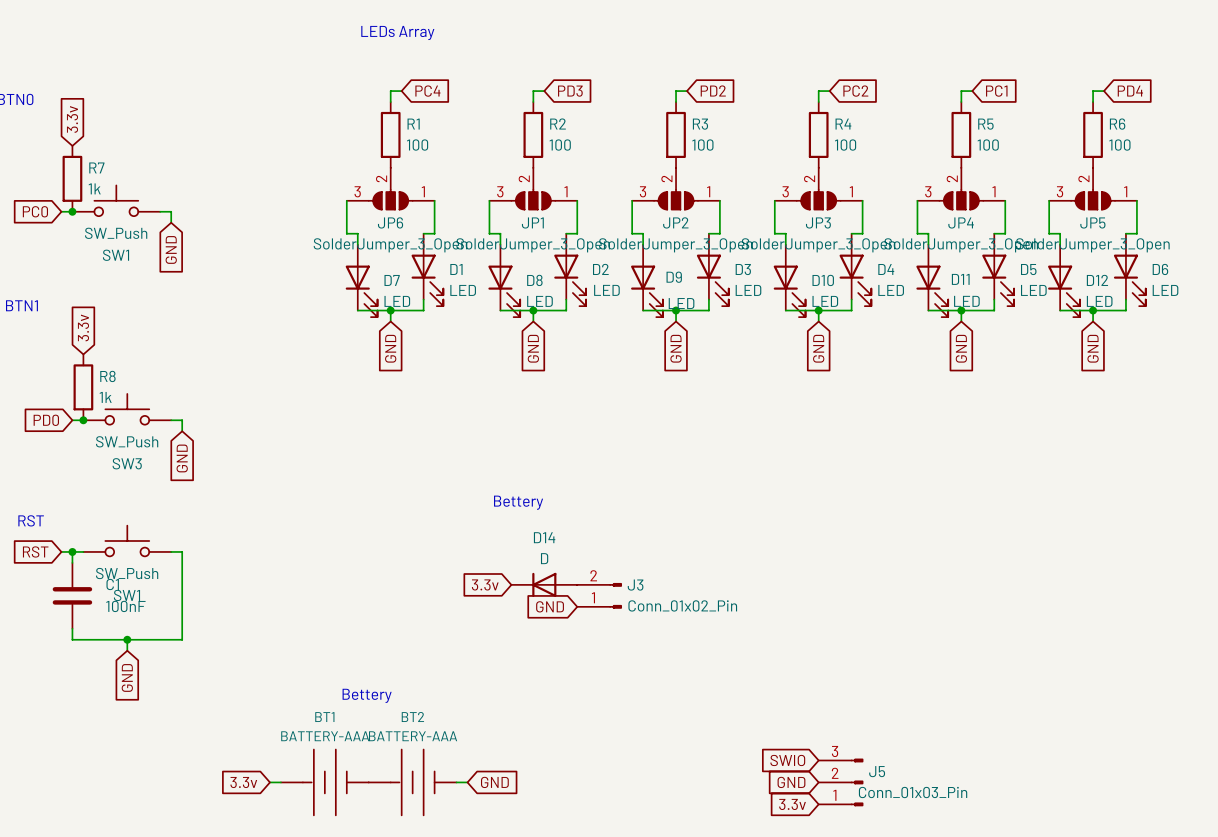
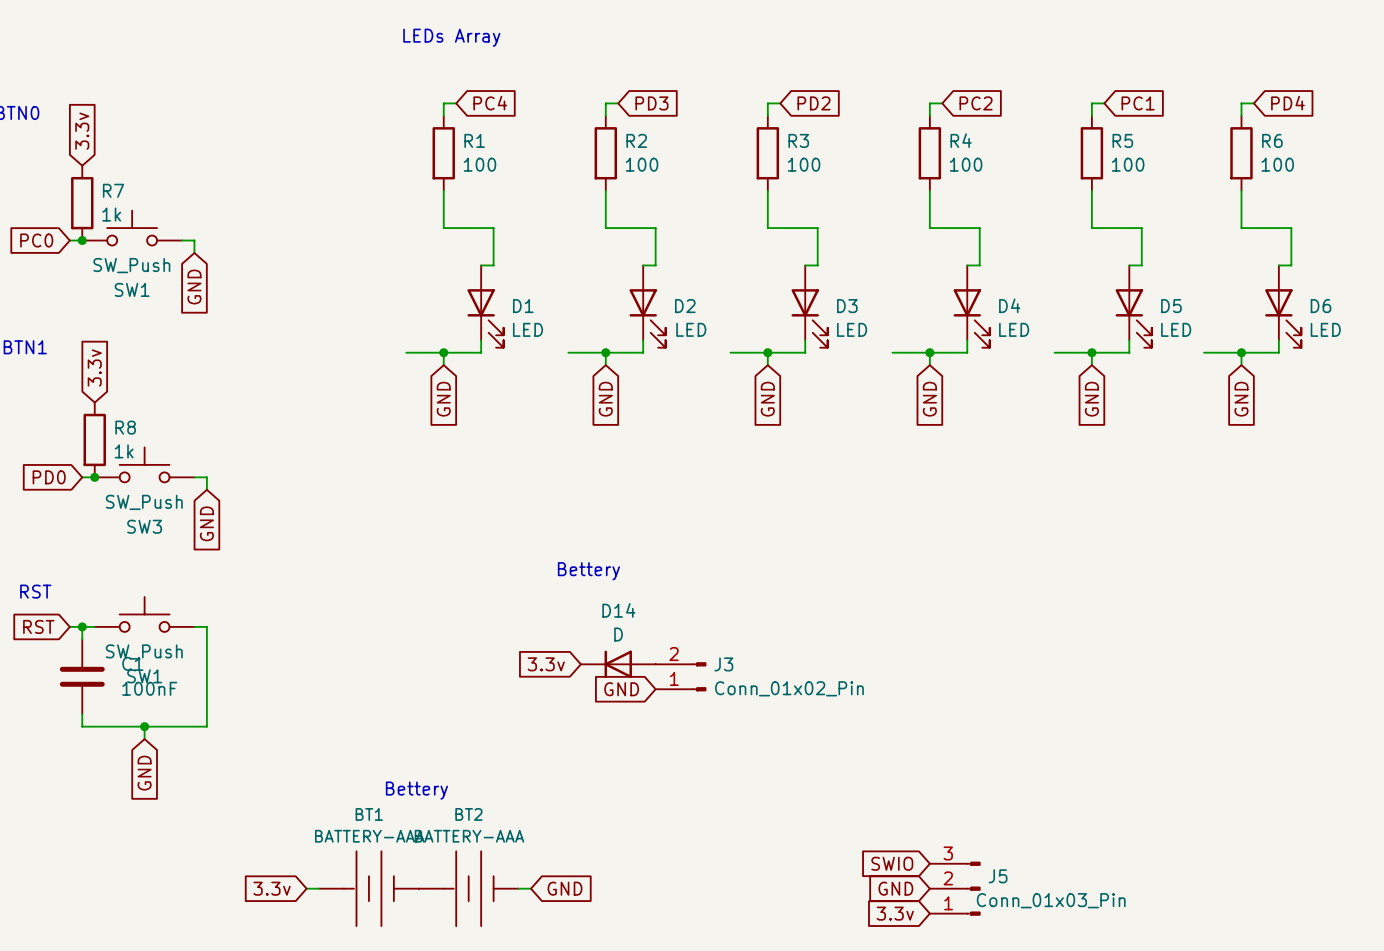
JP6: SolderJumper_3_Open (390, 188) -> none
JP1: SolderJumper_3_Open (533, 188) -> none
JP2: SolderJumper_3_Open (676, 188) -> none
JP3: SolderJumper_3_Open (818, 188) -> none
JP4: SolderJumper_3_Open (961, 188) -> none
JP5: SolderJumper_3_Open (1093, 188) -> none
wire: (346, 200) (346, 233) (357, 233) (357, 244) -> none
wire: (489, 200) (489, 233) (500, 233) (500, 244) -> none
wire: (632, 200) (632, 233) (643, 233) (643, 244) -> none
wire: (774, 200) (774, 233) (785, 233) (785, 244) -> none
wire: (917, 200) (917, 233) (928, 233) (928, 244) -> none
wire: (1049, 200) (1049, 233) (1060, 233) (1060, 244) -> none
D7: LED (361, 280) -> none
D8: LED (504, 280) -> none
D9: LED (646, 280) -> none
D10: LED (789, 280) -> none
D11: LED (932, 280) -> none
D12: LED (1063, 280) -> none

